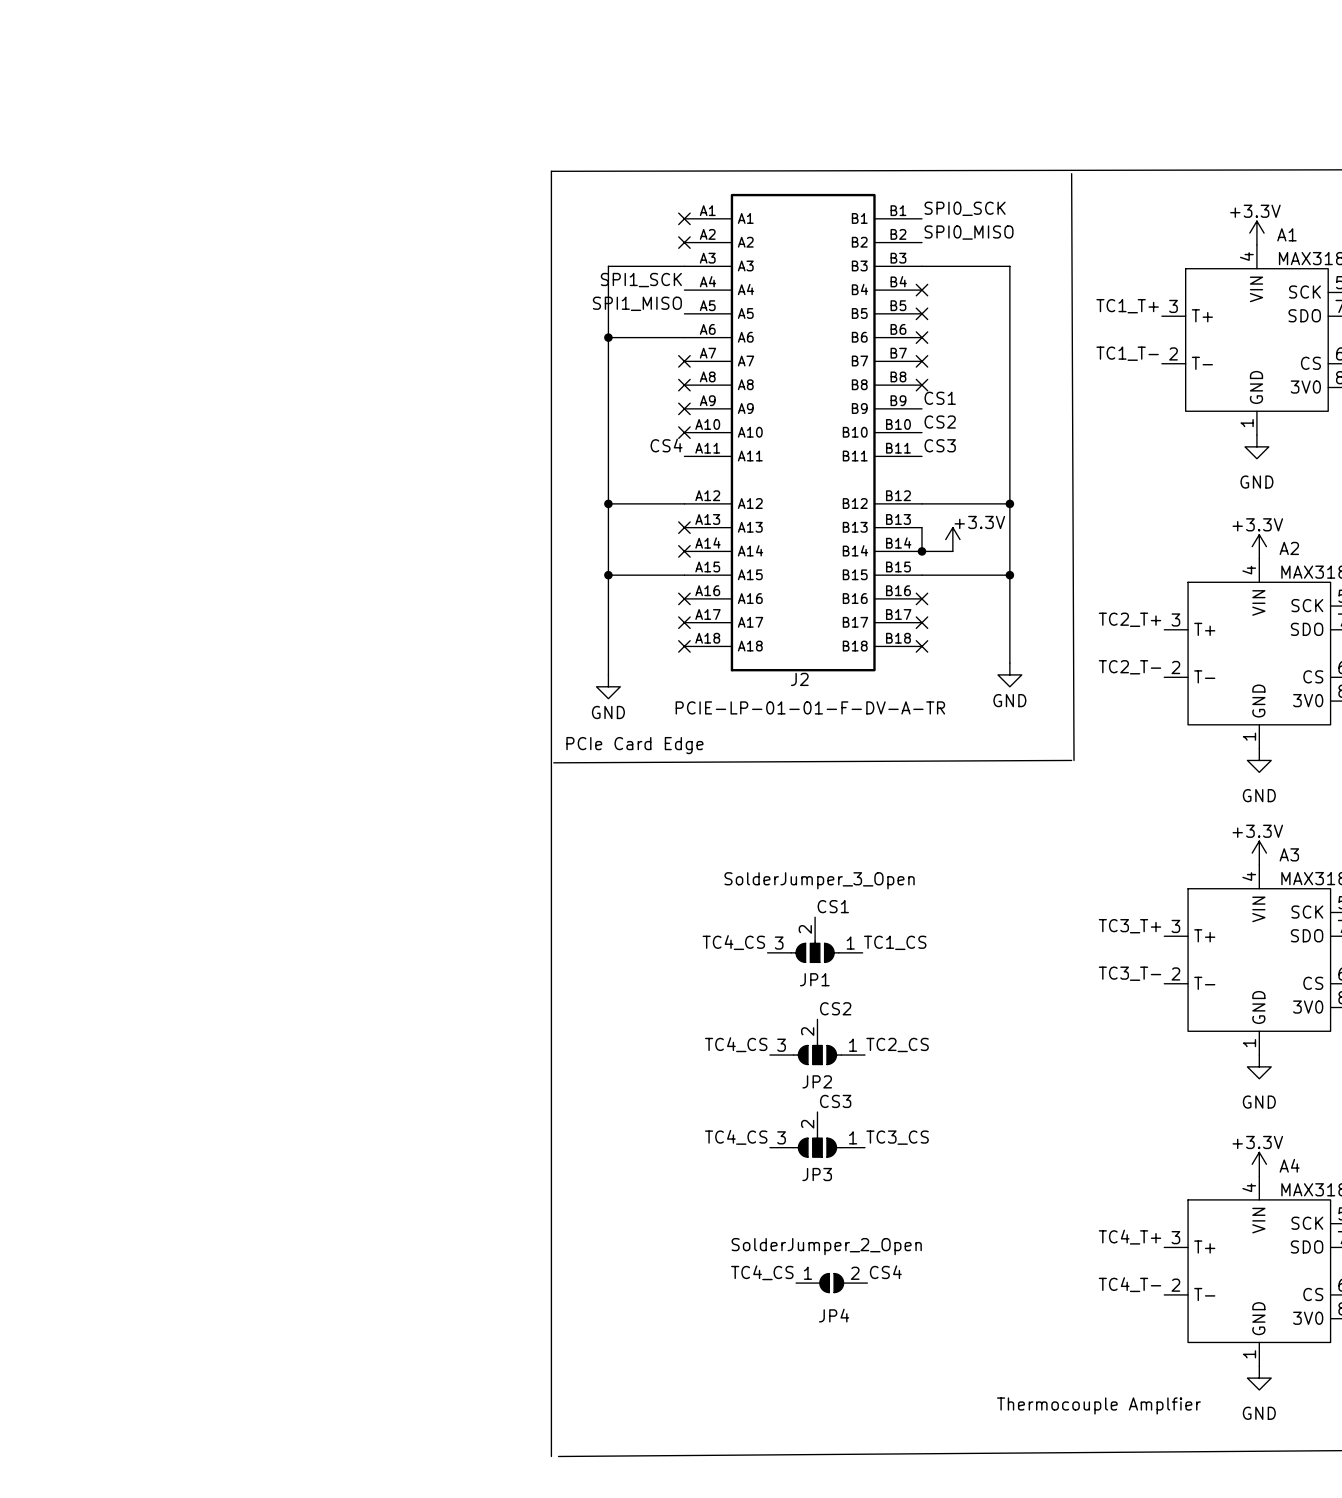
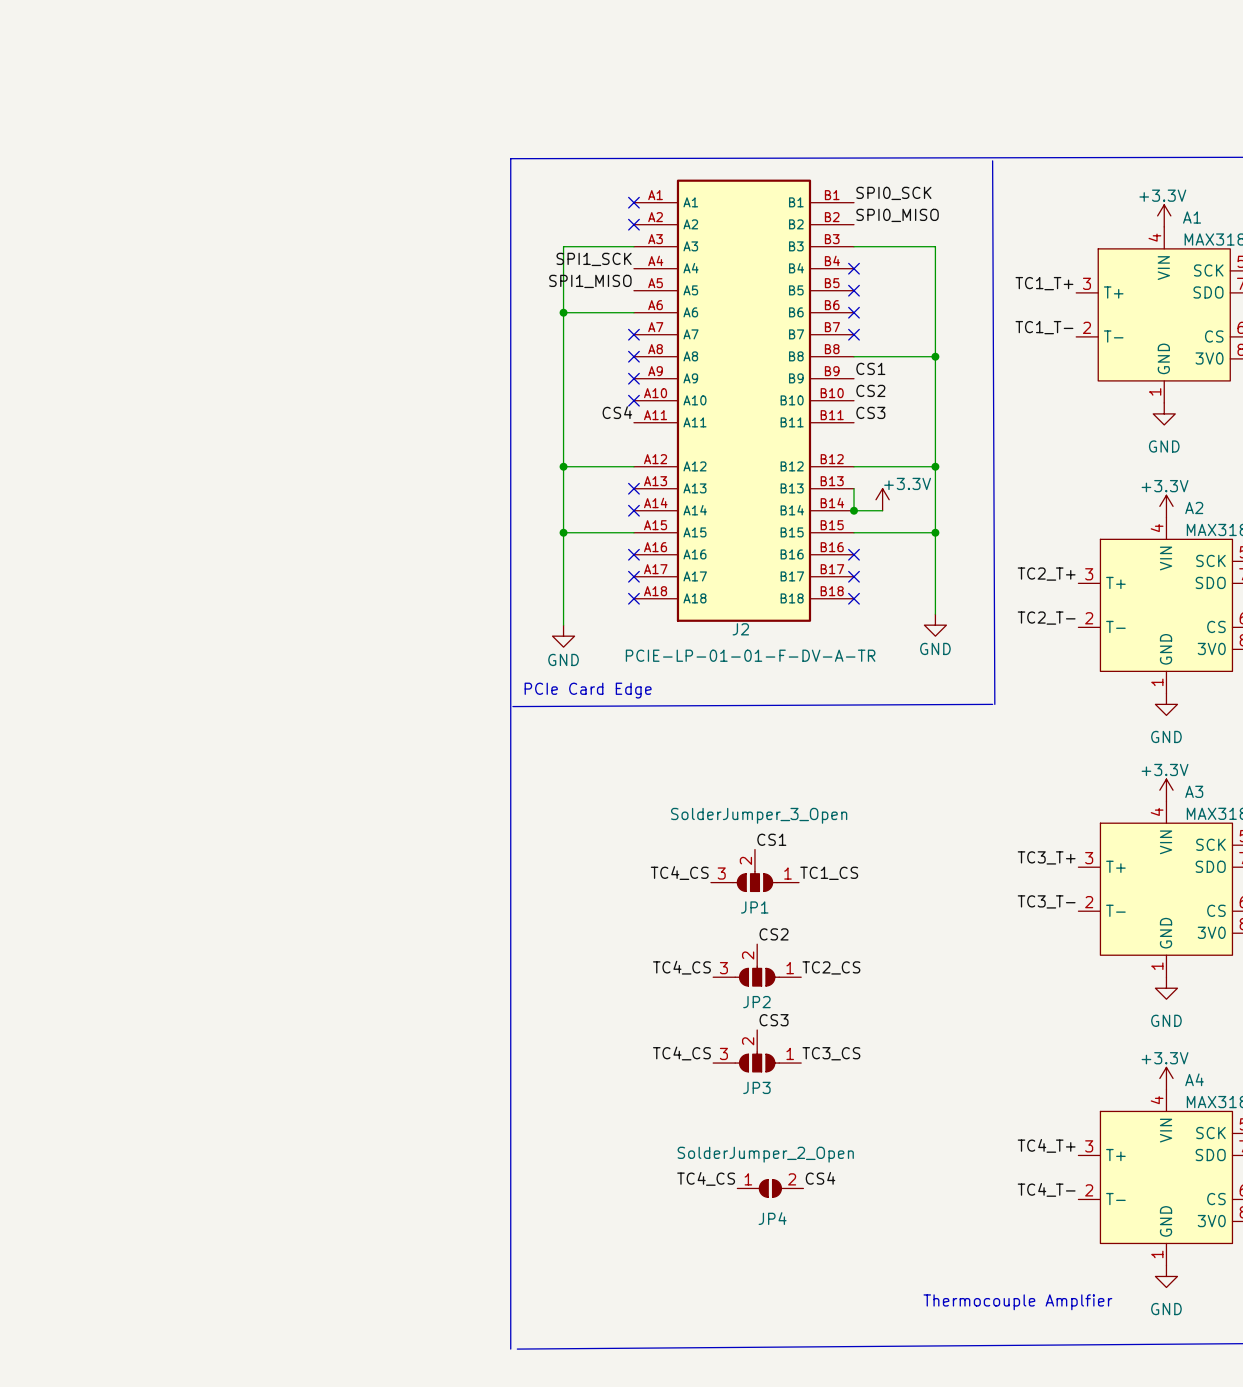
wire: none -> (854, 356) (935, 356)
no-connect mark: (921, 385) -> none
junction: none -> (935, 356)

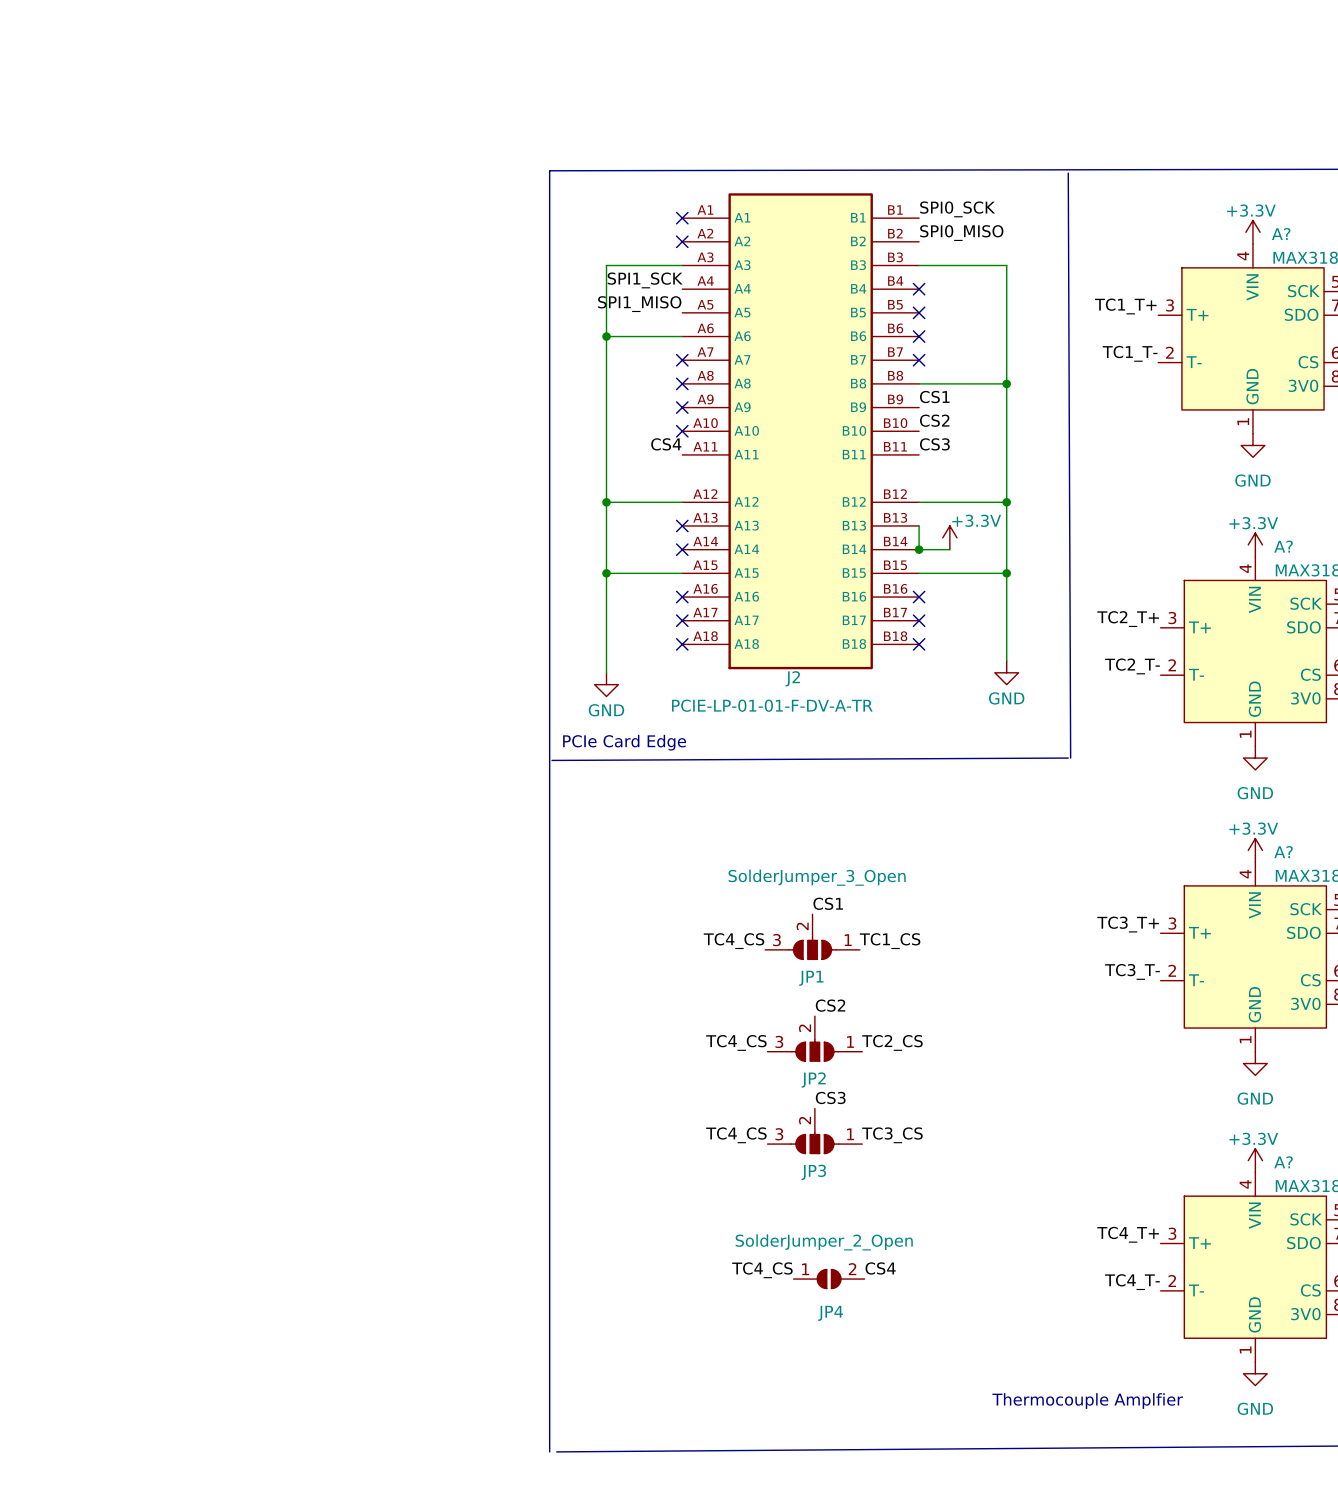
A1 name: A1 (1192, 217) -> A? (1281, 234)
A2 name: A2 (1194, 507) -> A? (1283, 546)
A3 name: A3 (1194, 791) -> A? (1283, 852)
A4 name: A4 (1194, 1079) -> A? (1283, 1162)

